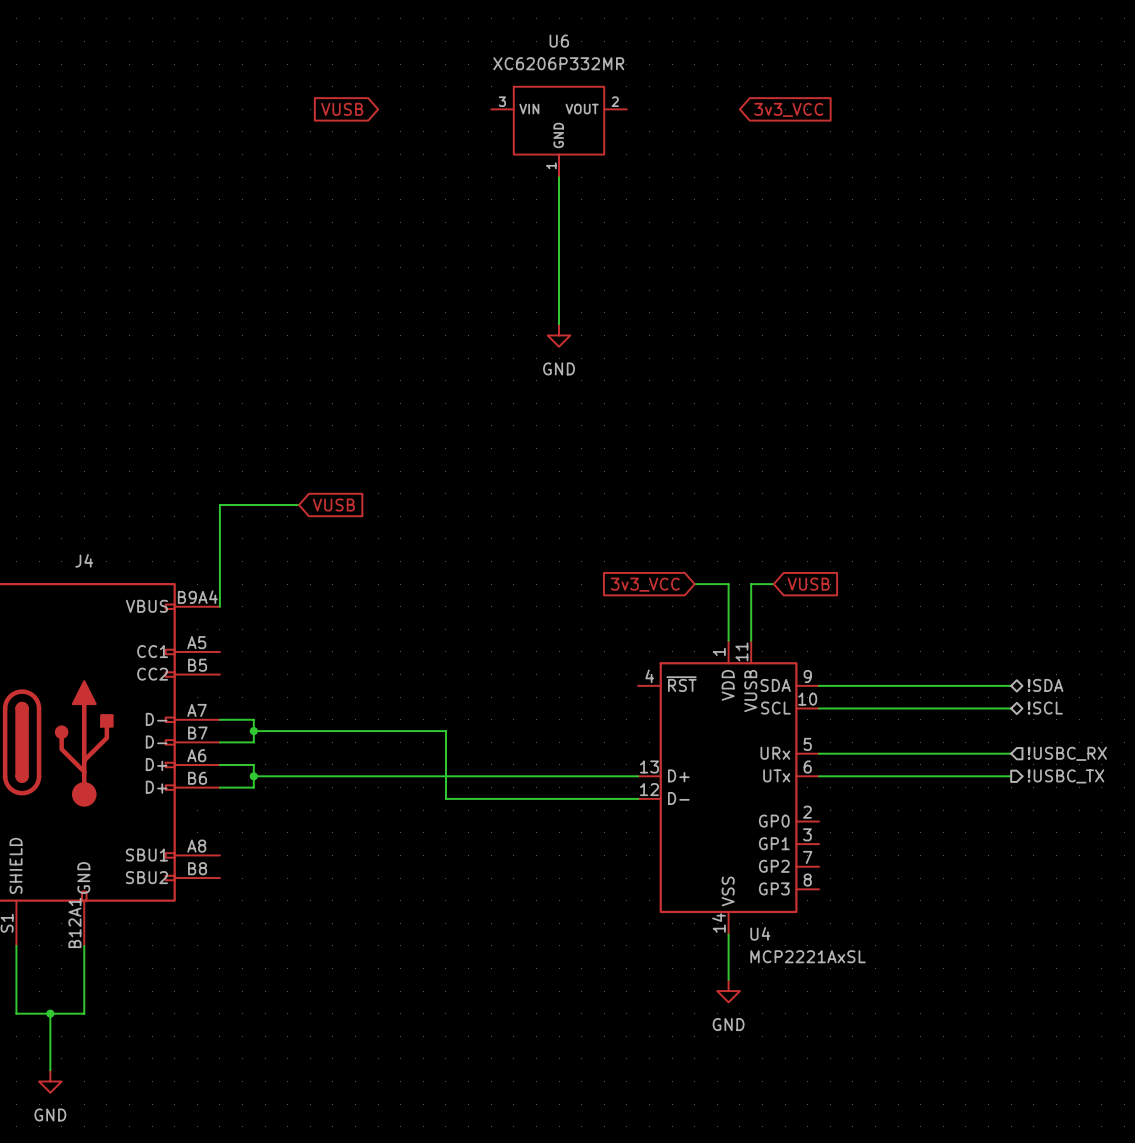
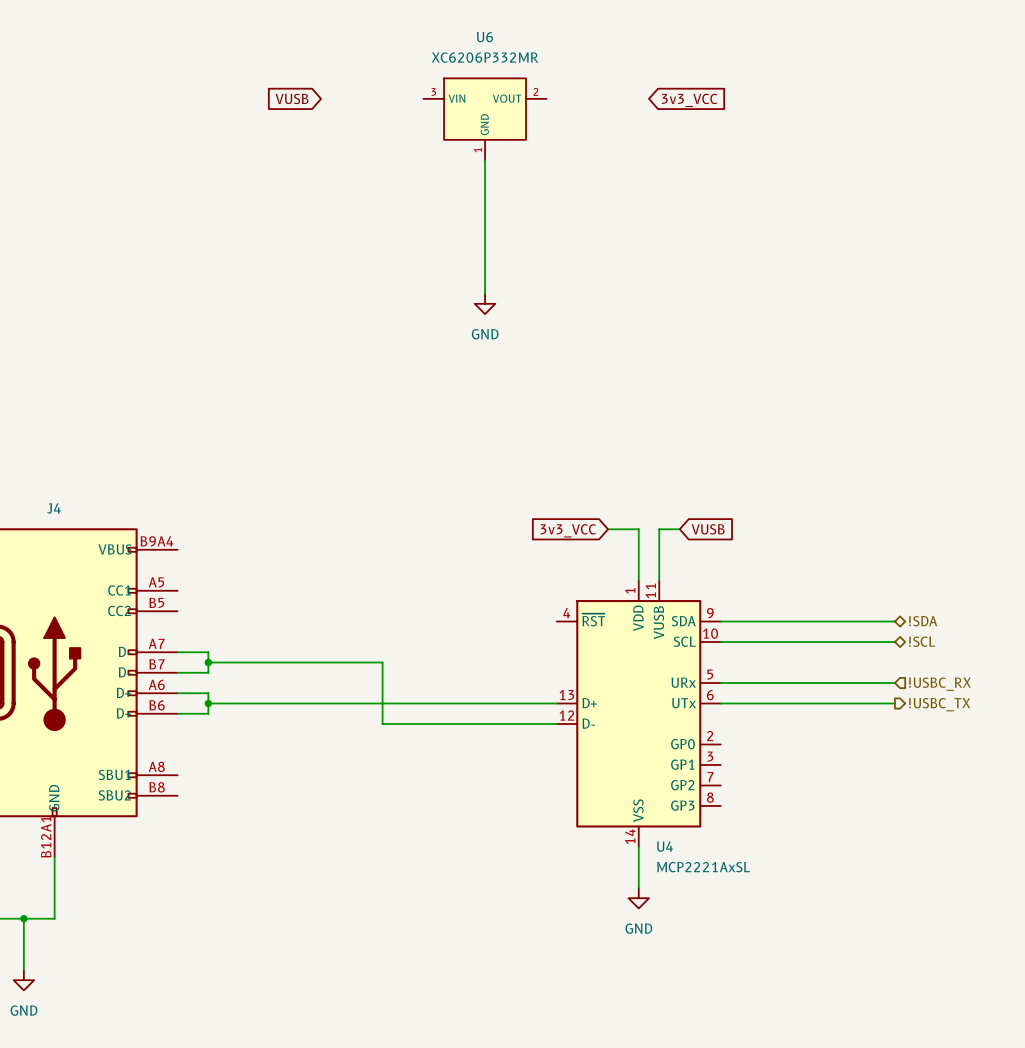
wire: (299, 505) (219, 505) (219, 606) -> none
global label: VUSB (333, 505) -> none

